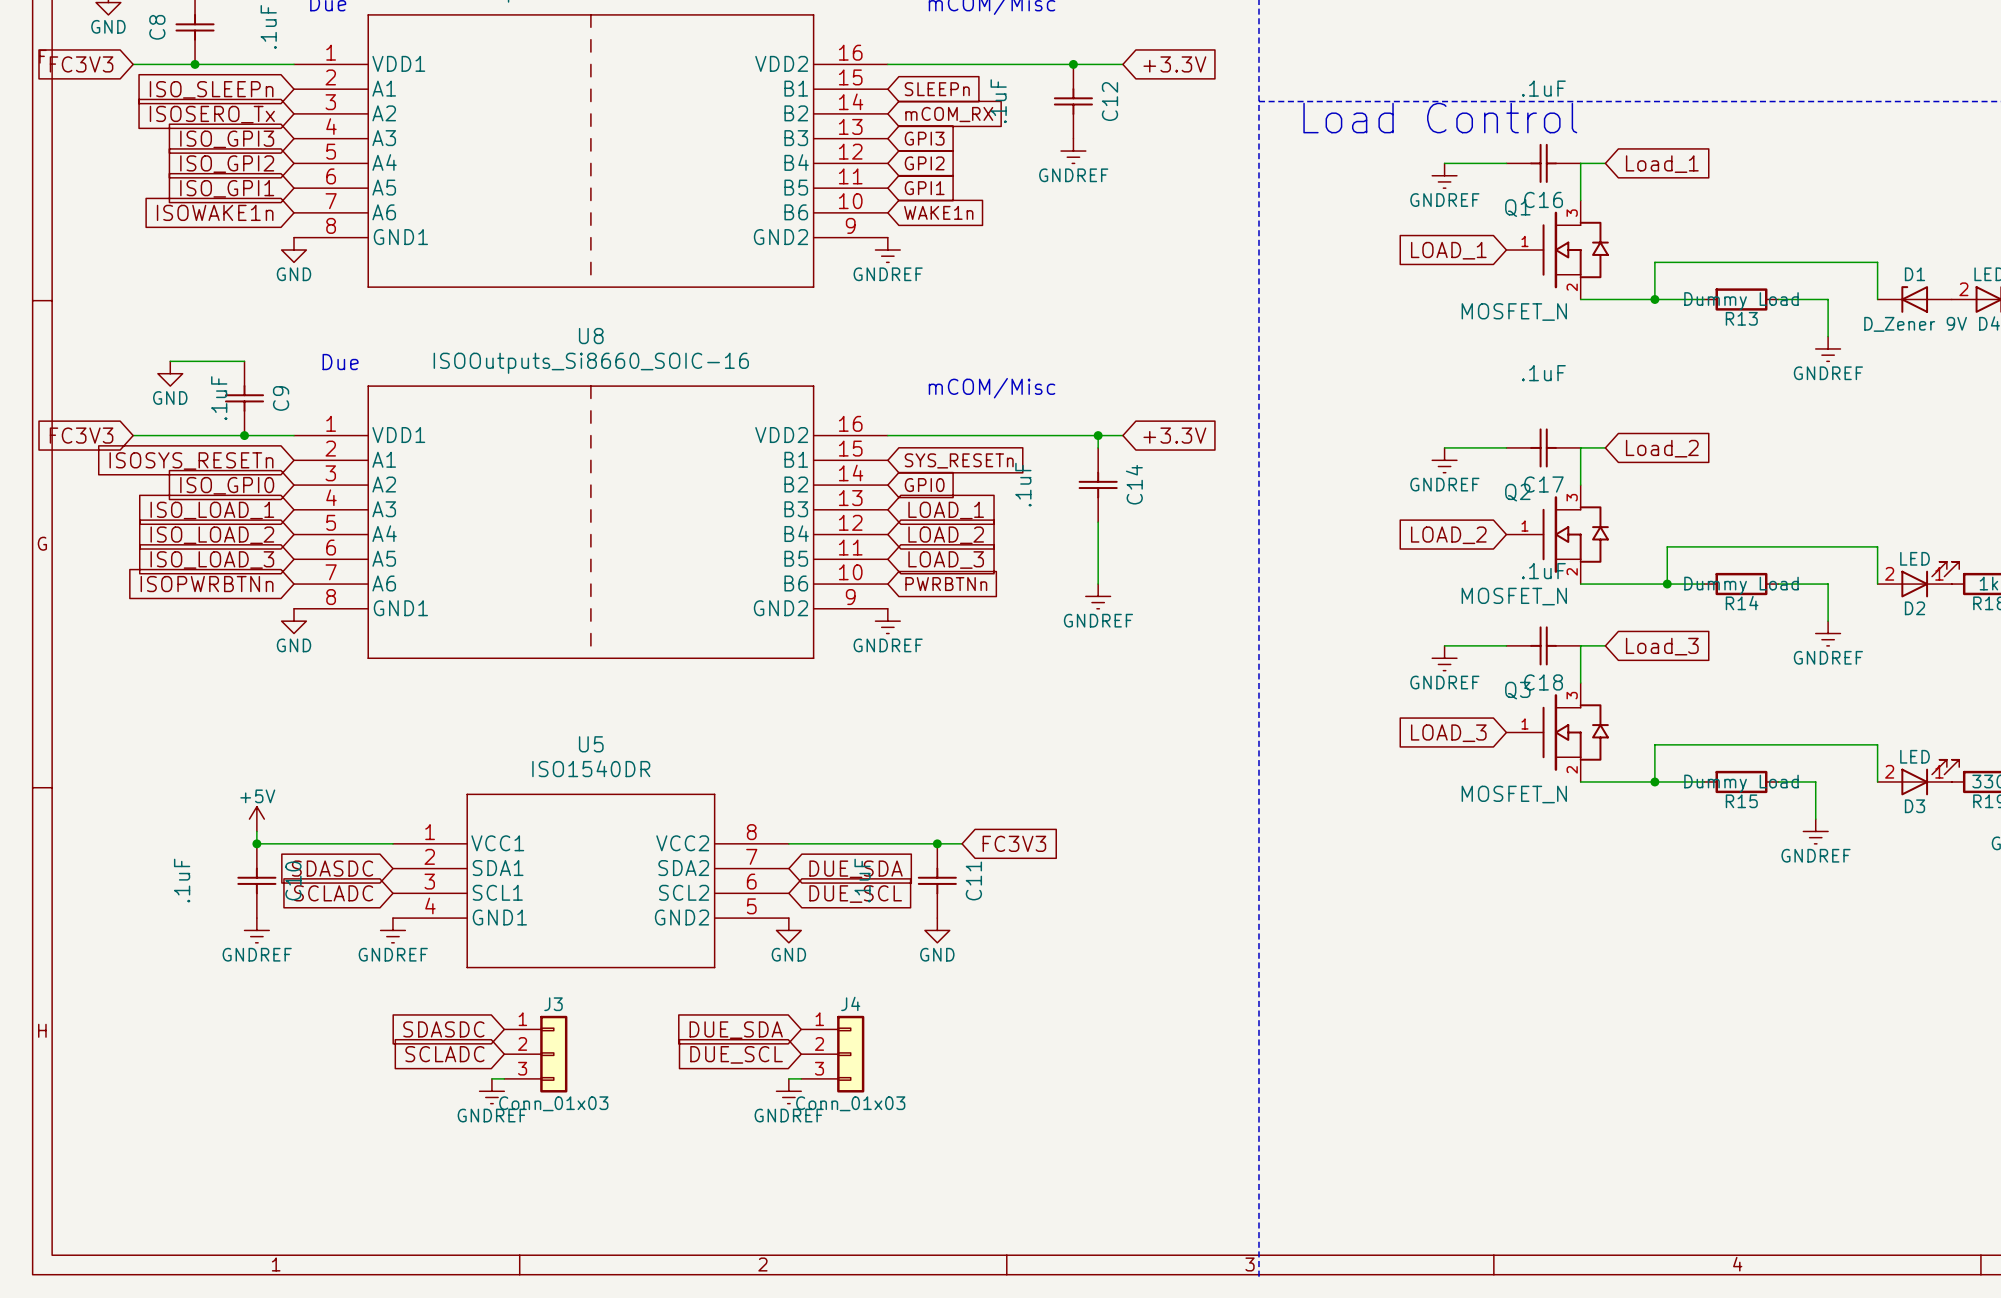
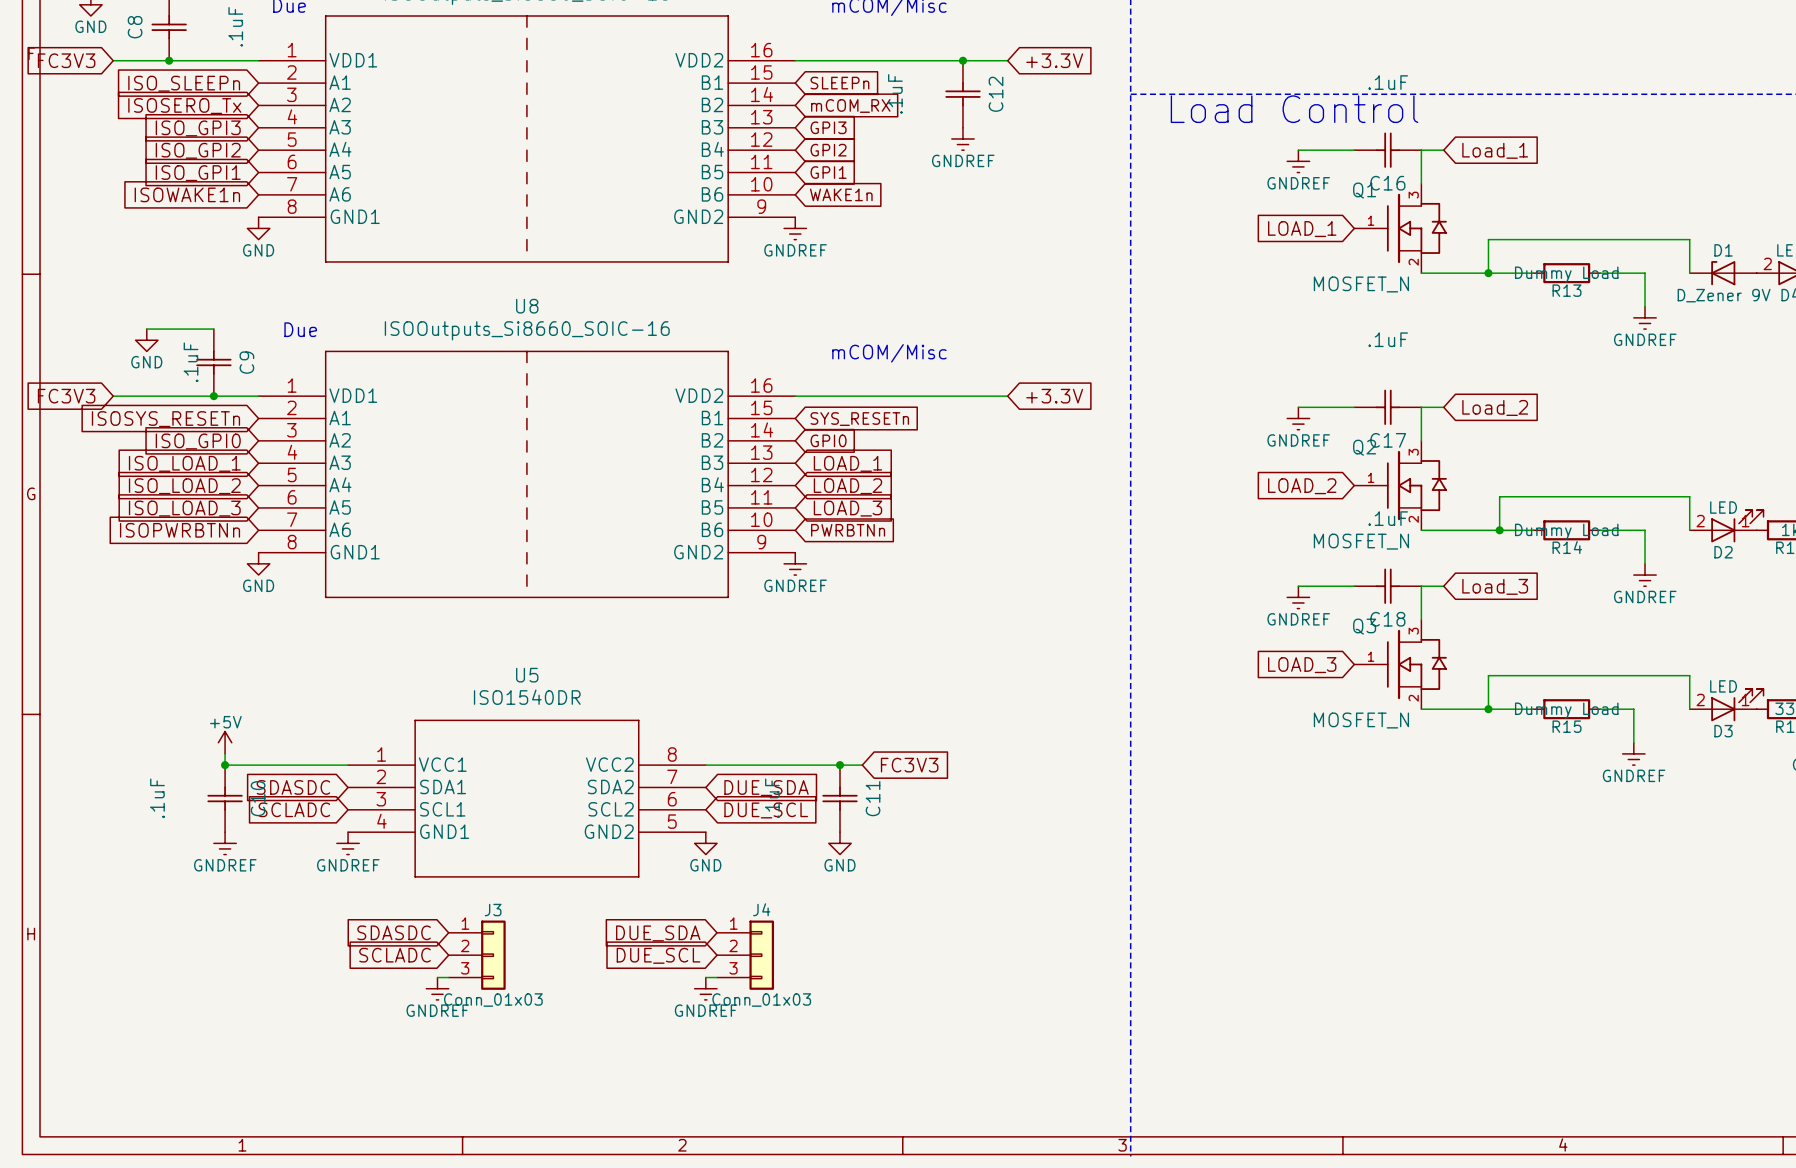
wire: (1098, 435) (1098, 447) -> none
junction: (1098, 435) -> none
C14: .1uF (1098, 485) -> none
wire: (1098, 522) (1098, 584) -> none
power symbol: GNDREF (1098, 596) -> none

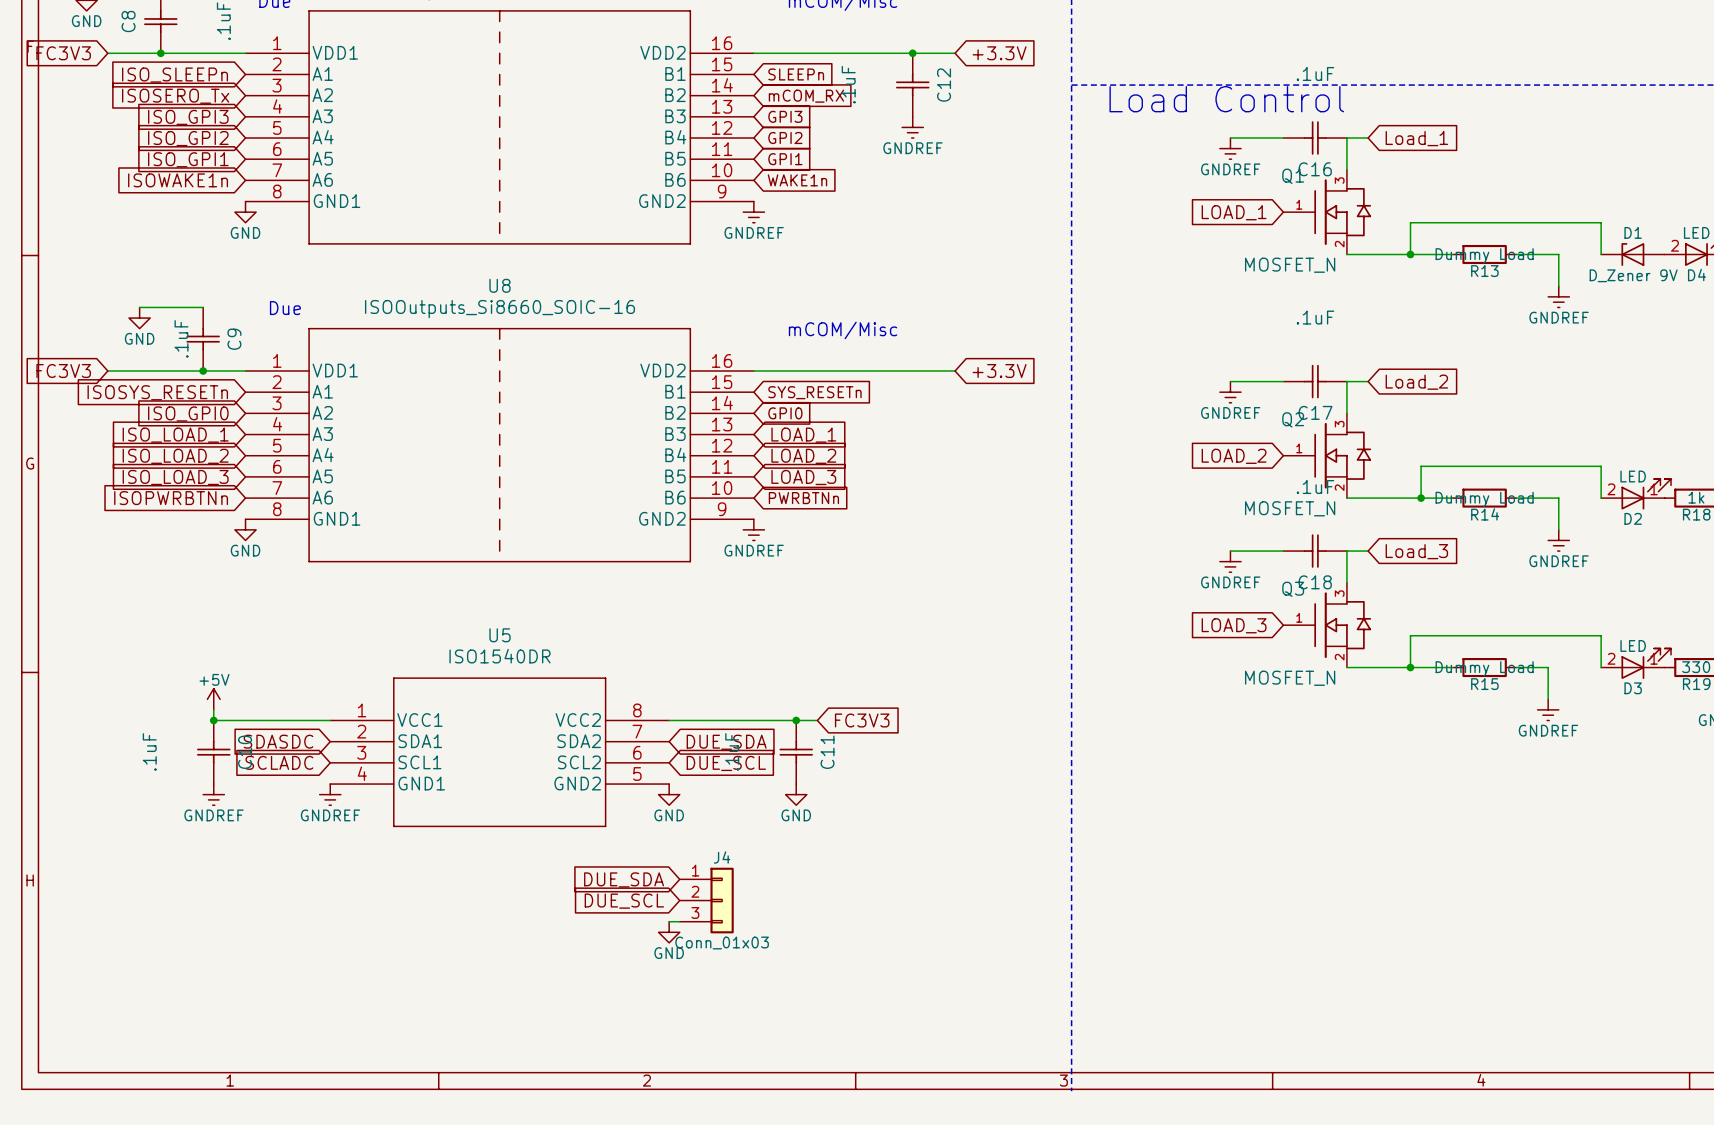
global label: SDASDC (394, 932) -> none
global label: SCLADC (395, 955) -> none
J3: Conn_01x03 (477, 955) -> none
wire: (437, 977) (448, 977) -> none
power symbol: GNDREF (437, 988) -> none
power symbol: GNDREF (705, 988) -> GND (669, 932)

